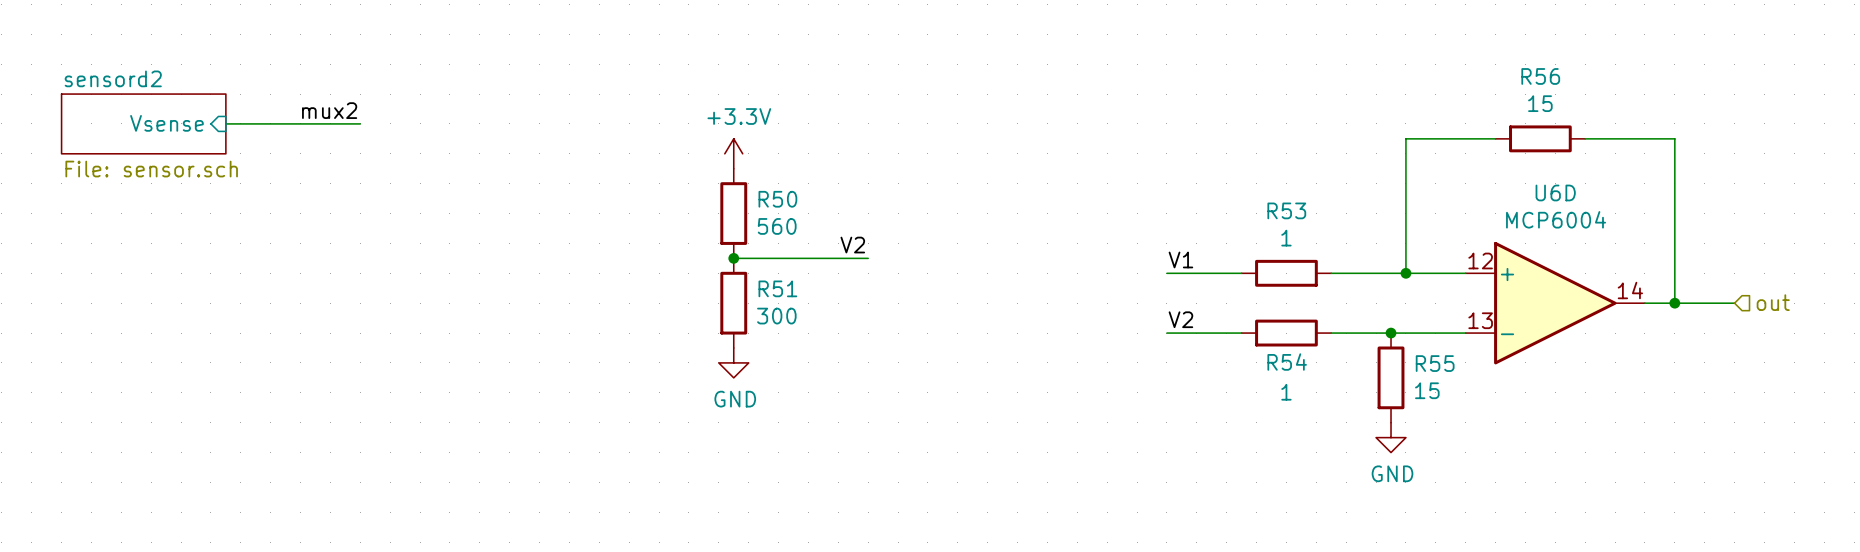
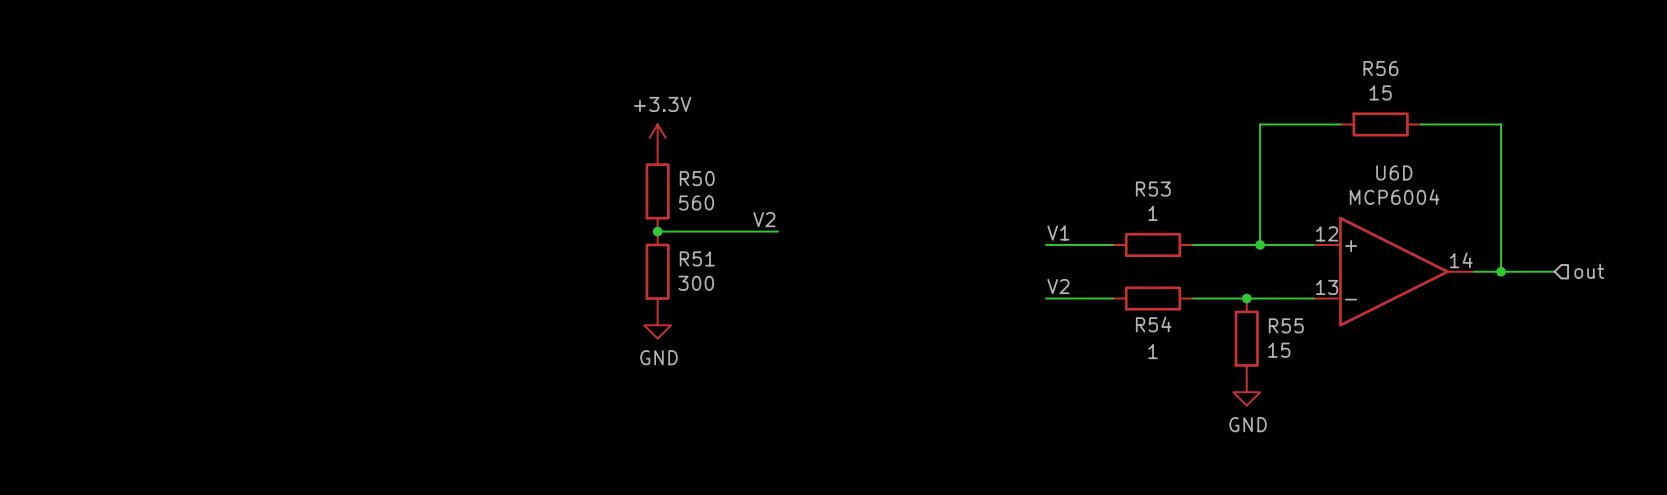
label: mux2 (329, 110) -> none
sheet sensord2: File: sensor.sch (143, 123) -> none
sheet pin: Vsense (166, 123) -> none
wire: (225, 123) (360, 123) -> none

